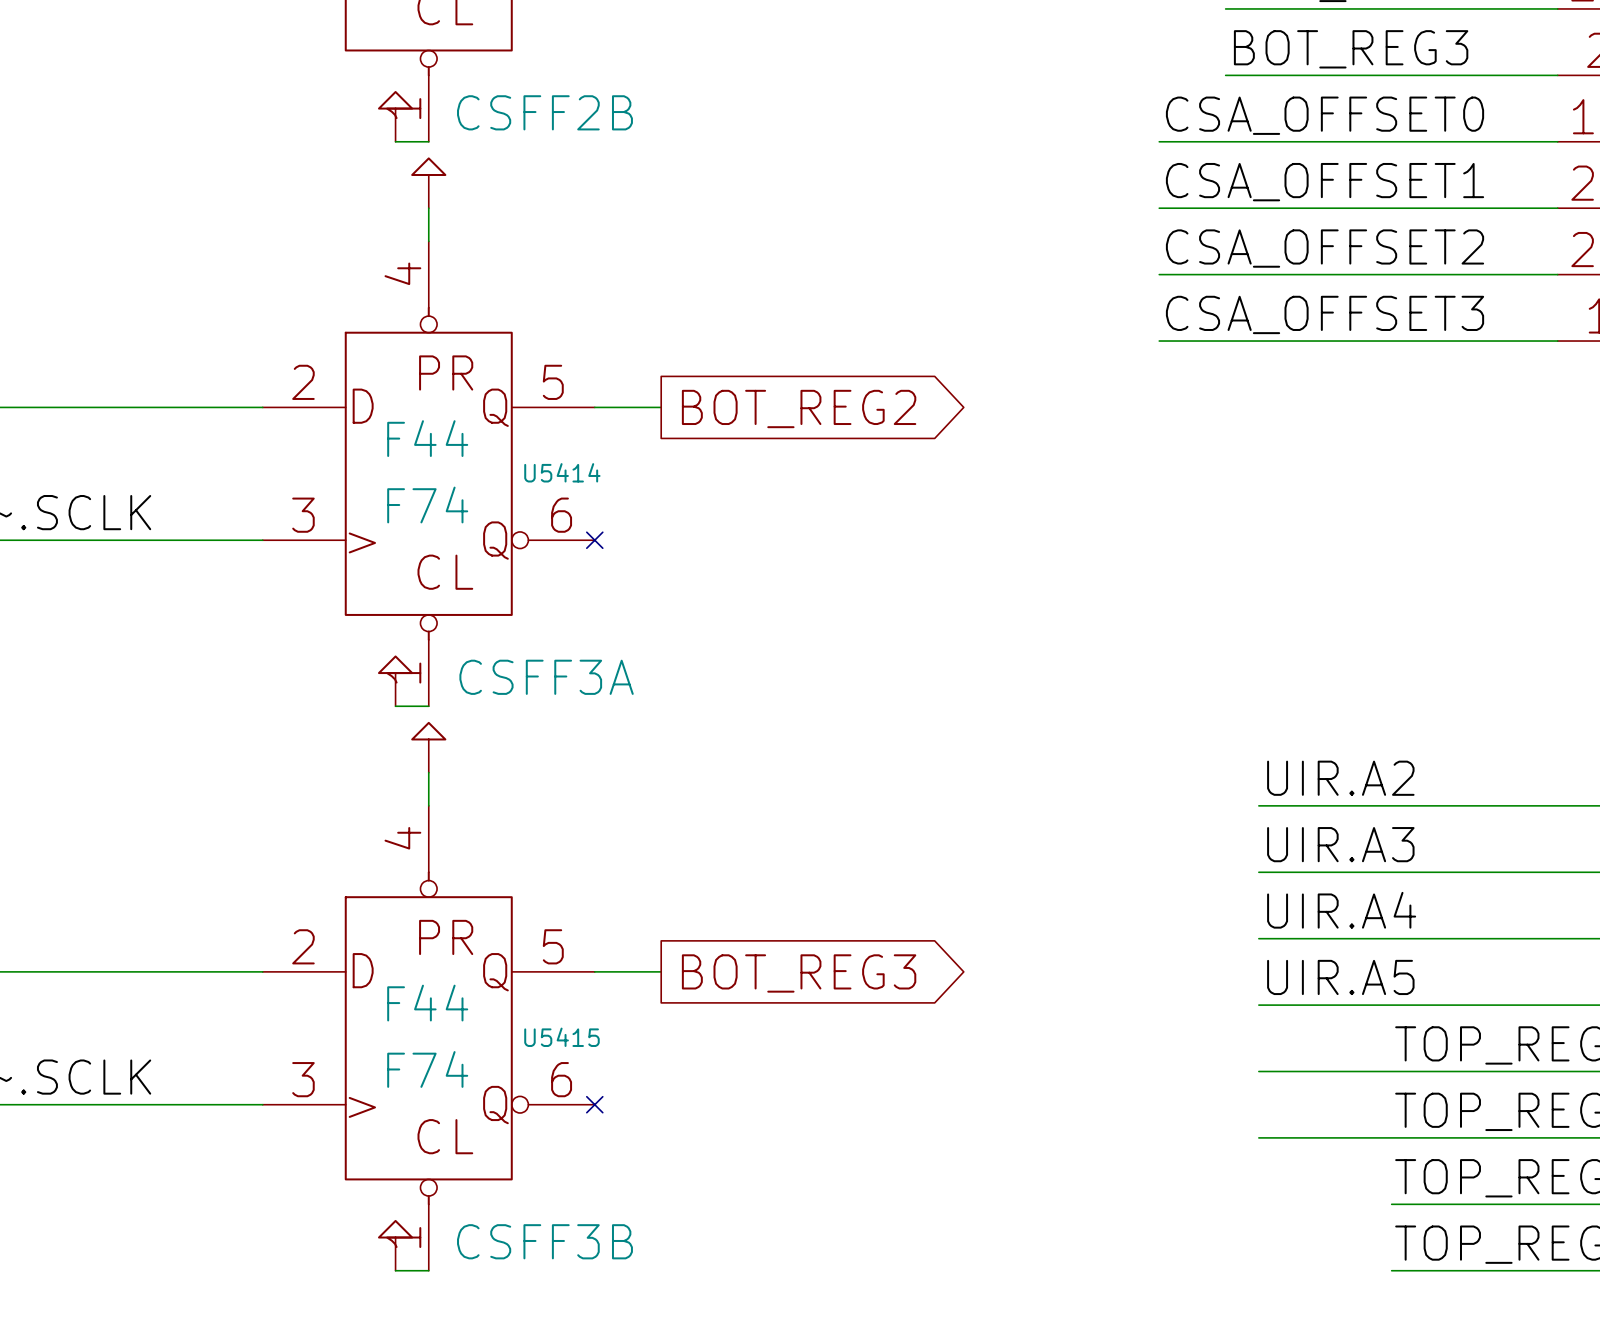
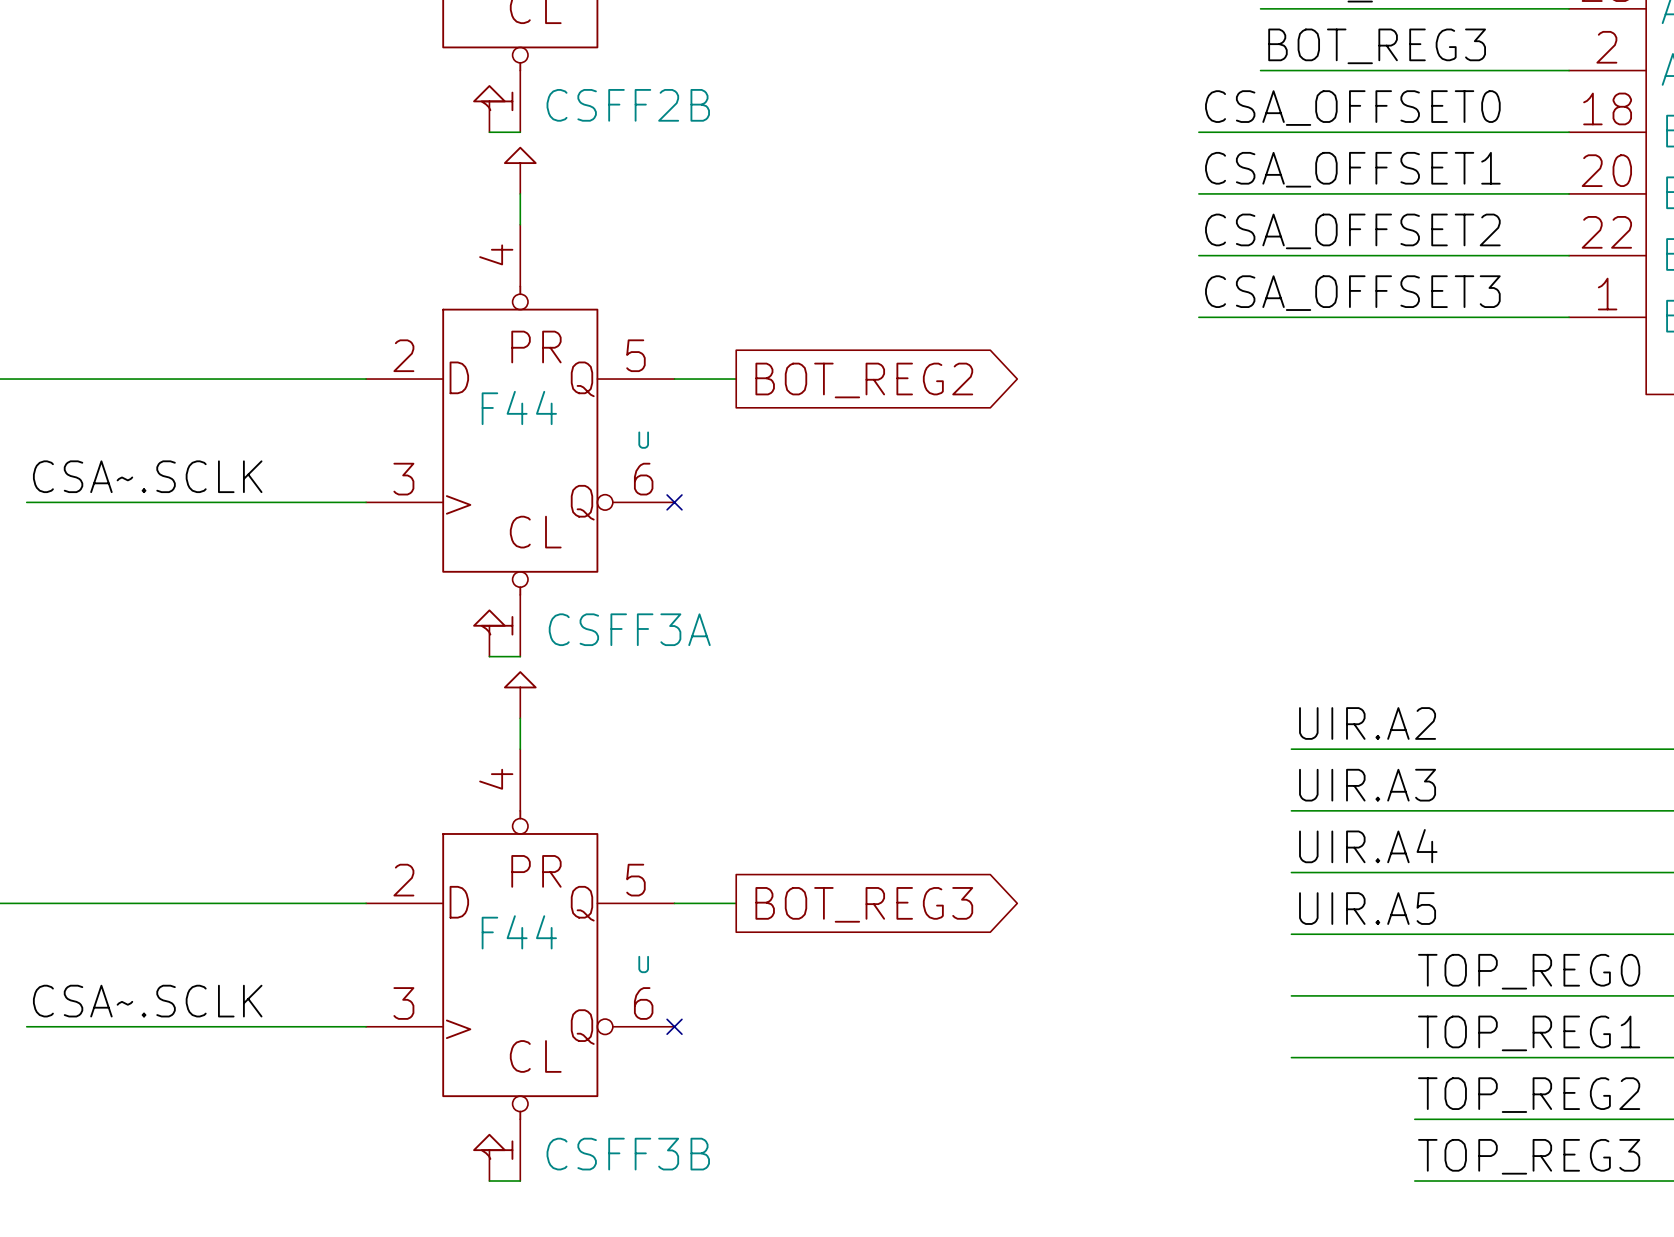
U5414 name: U5414 (562, 472) -> U (643, 440)
U5414 value: F74 (427, 505) -> none
U5415 name: U5415 (561, 1037) -> U (643, 964)
U5415 value: F74 (427, 1069) -> none

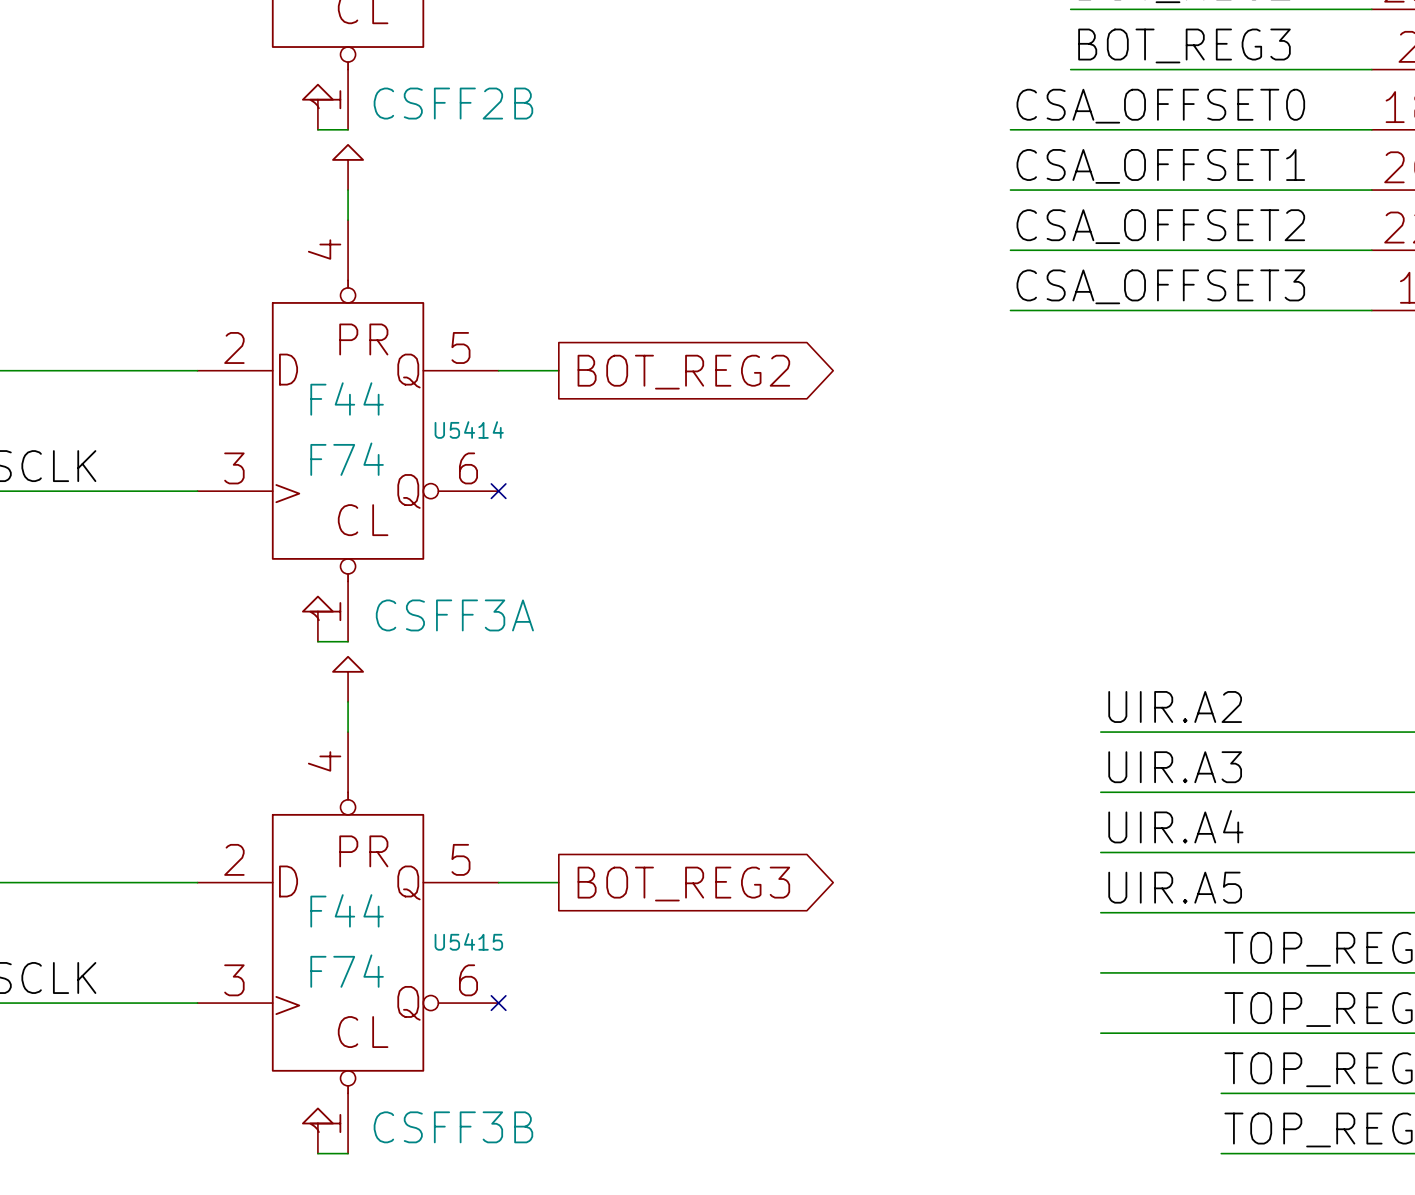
U name: U (643, 440) -> U5414 (469, 430)
U value: none -> F74 (347, 459)
U name: U (643, 964) -> U5415 (468, 941)
U value: none -> F74 (347, 971)

